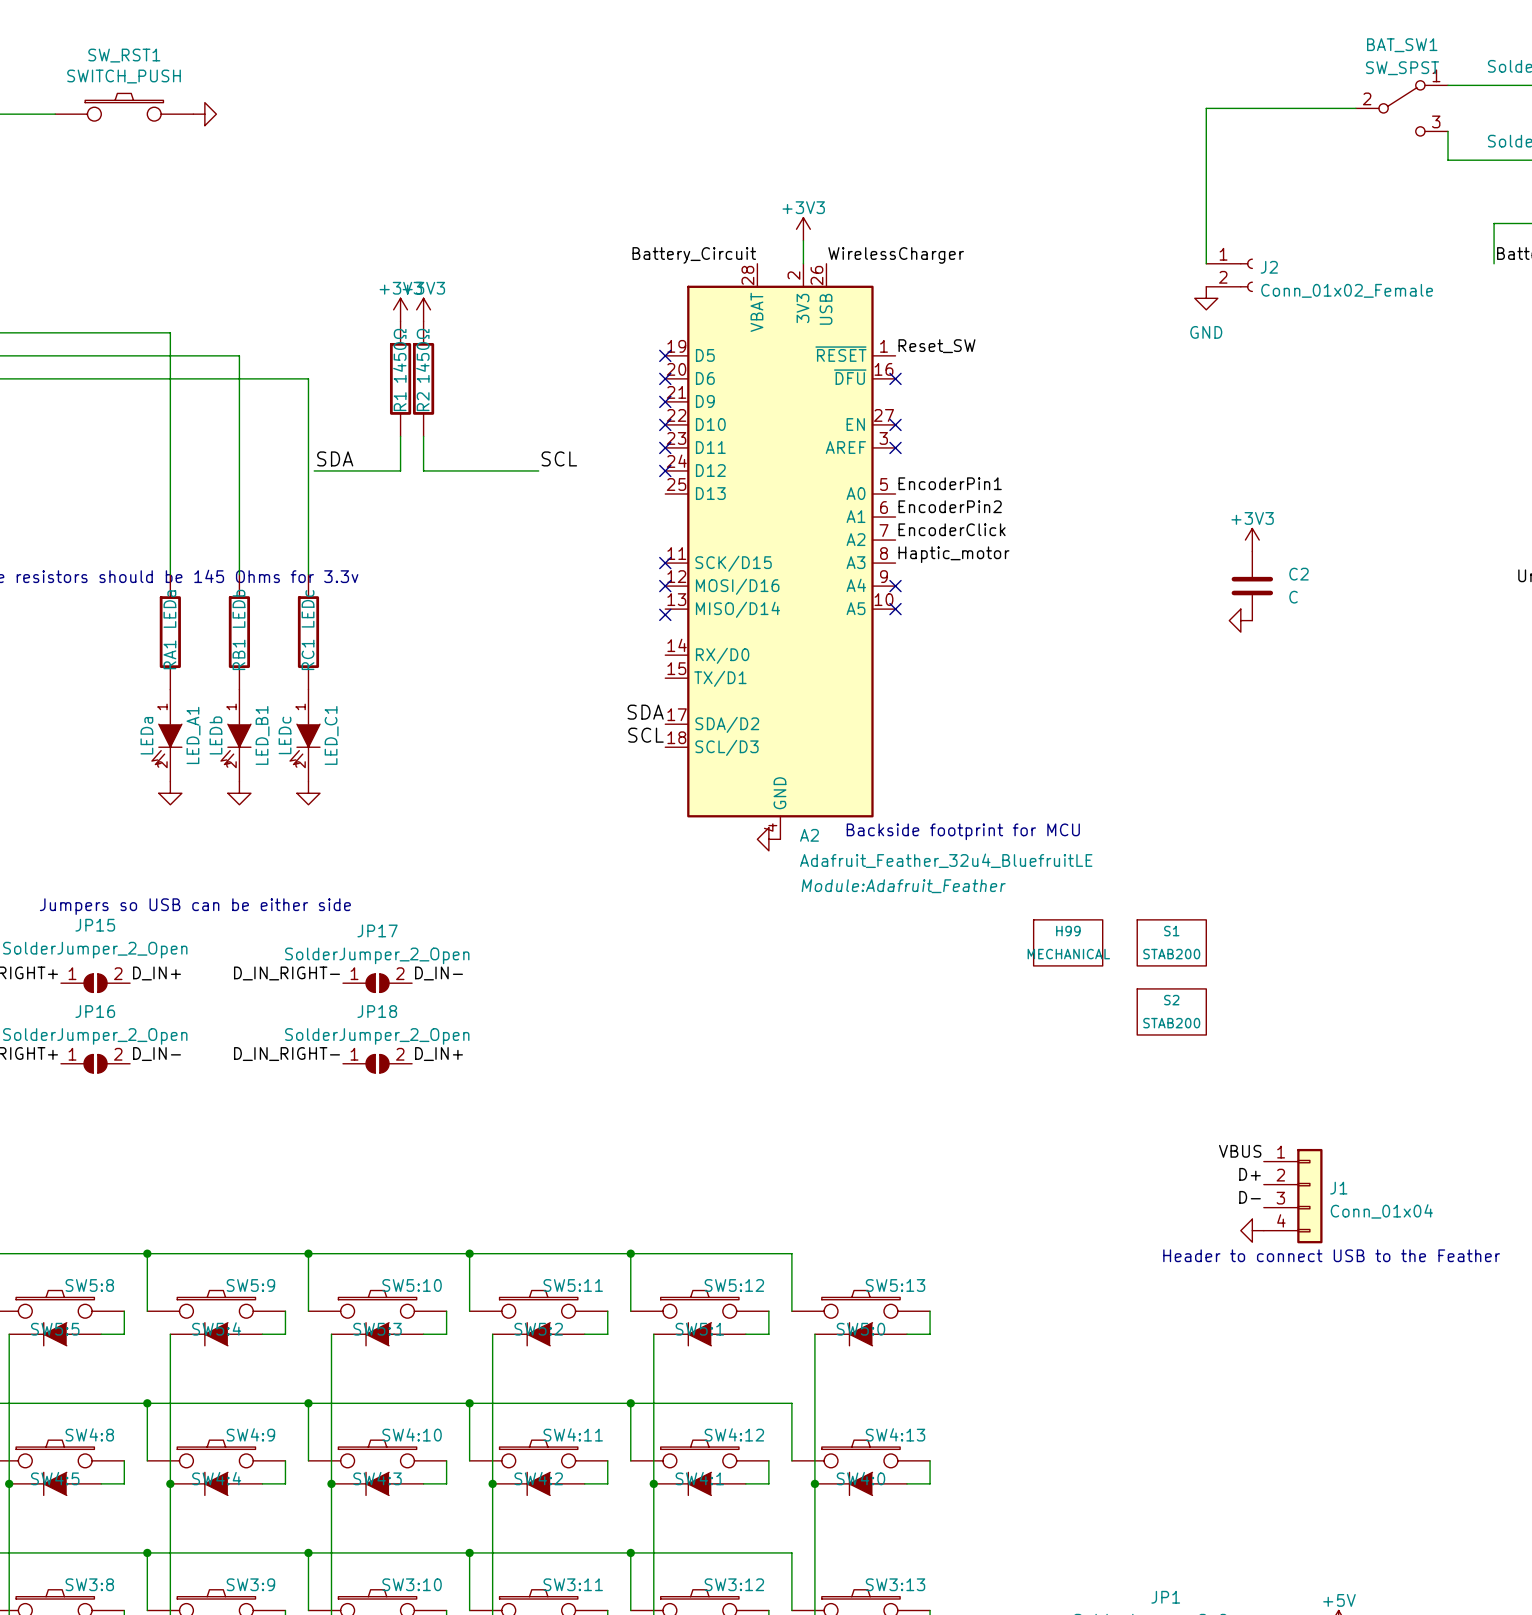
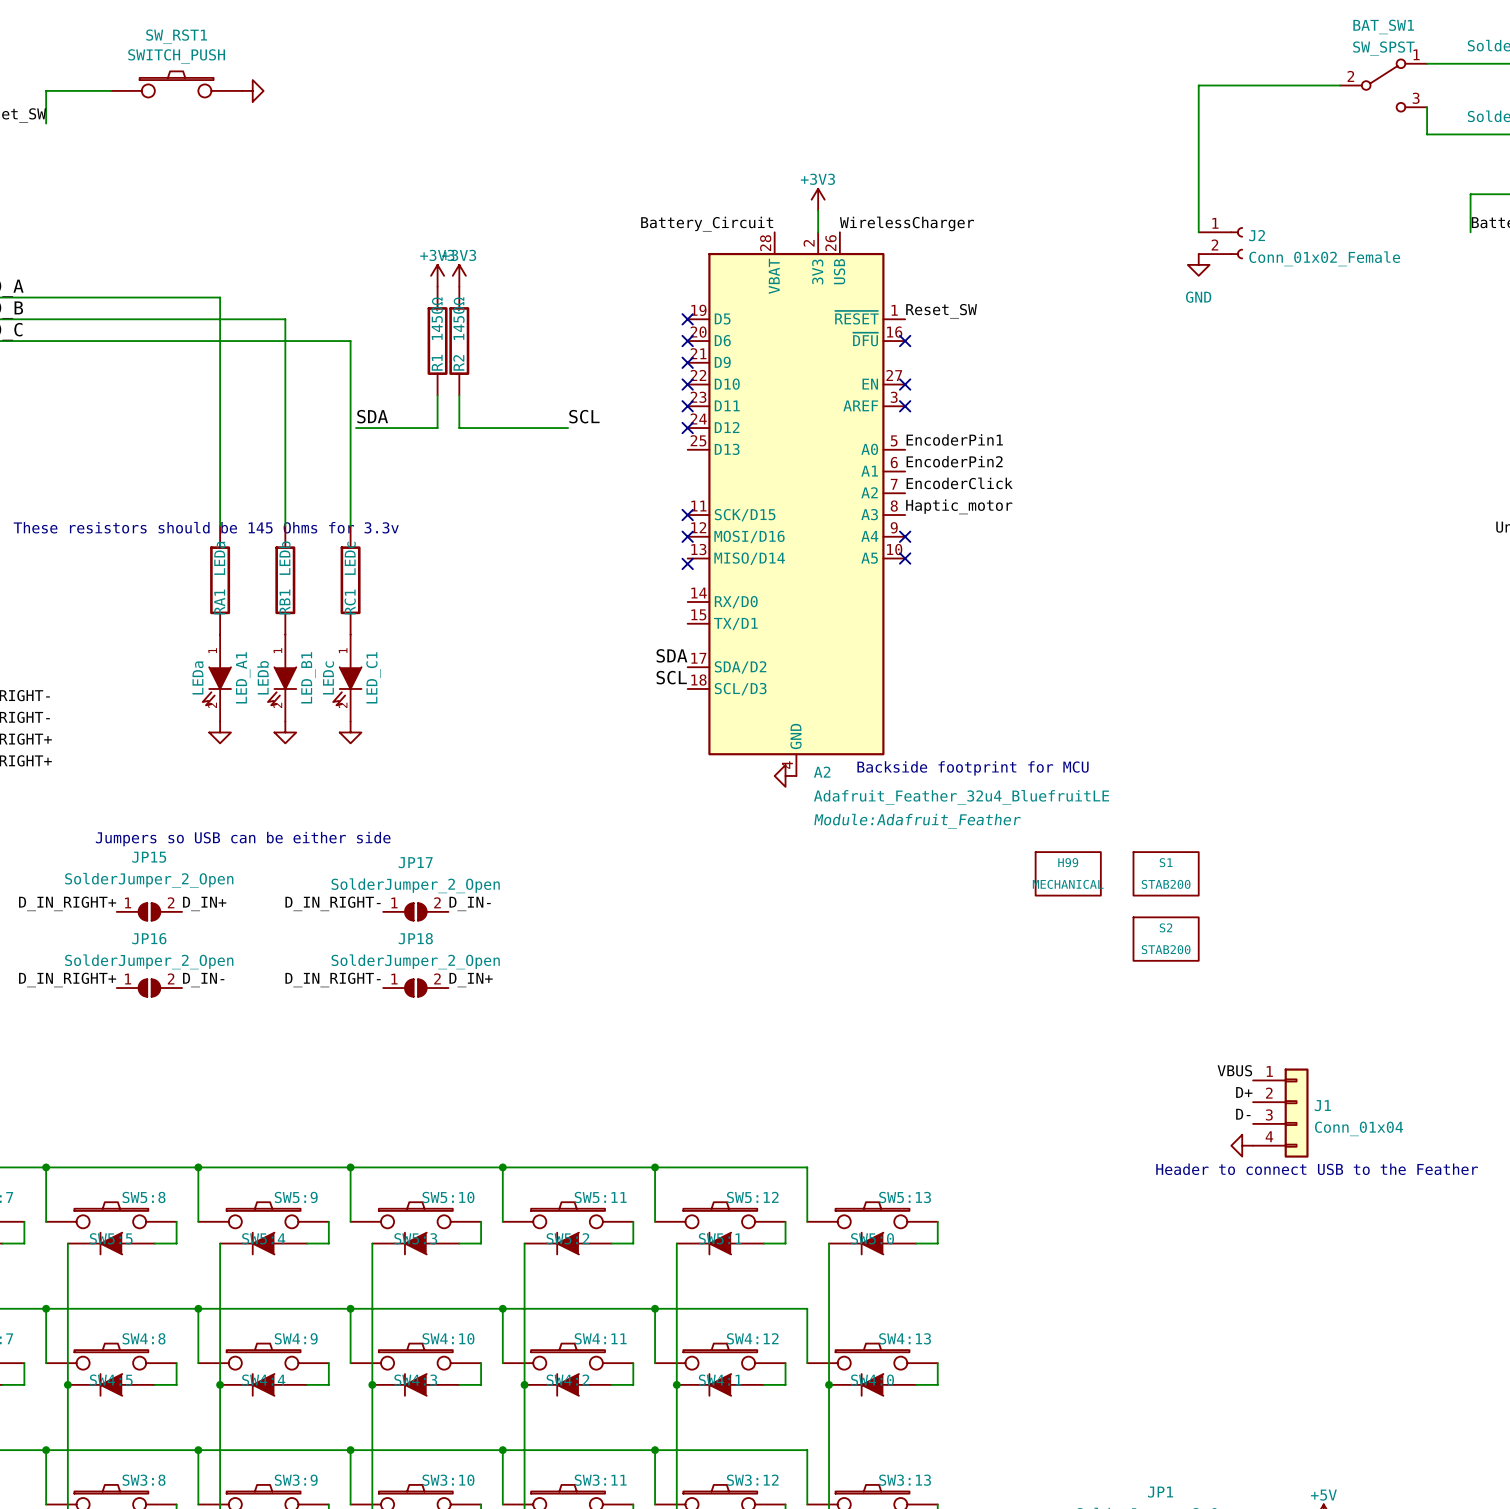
power symbol: +3V3 (1252, 540) -> none
C2: C (1252, 586) -> none
power symbol: (1240, 620) -> none

